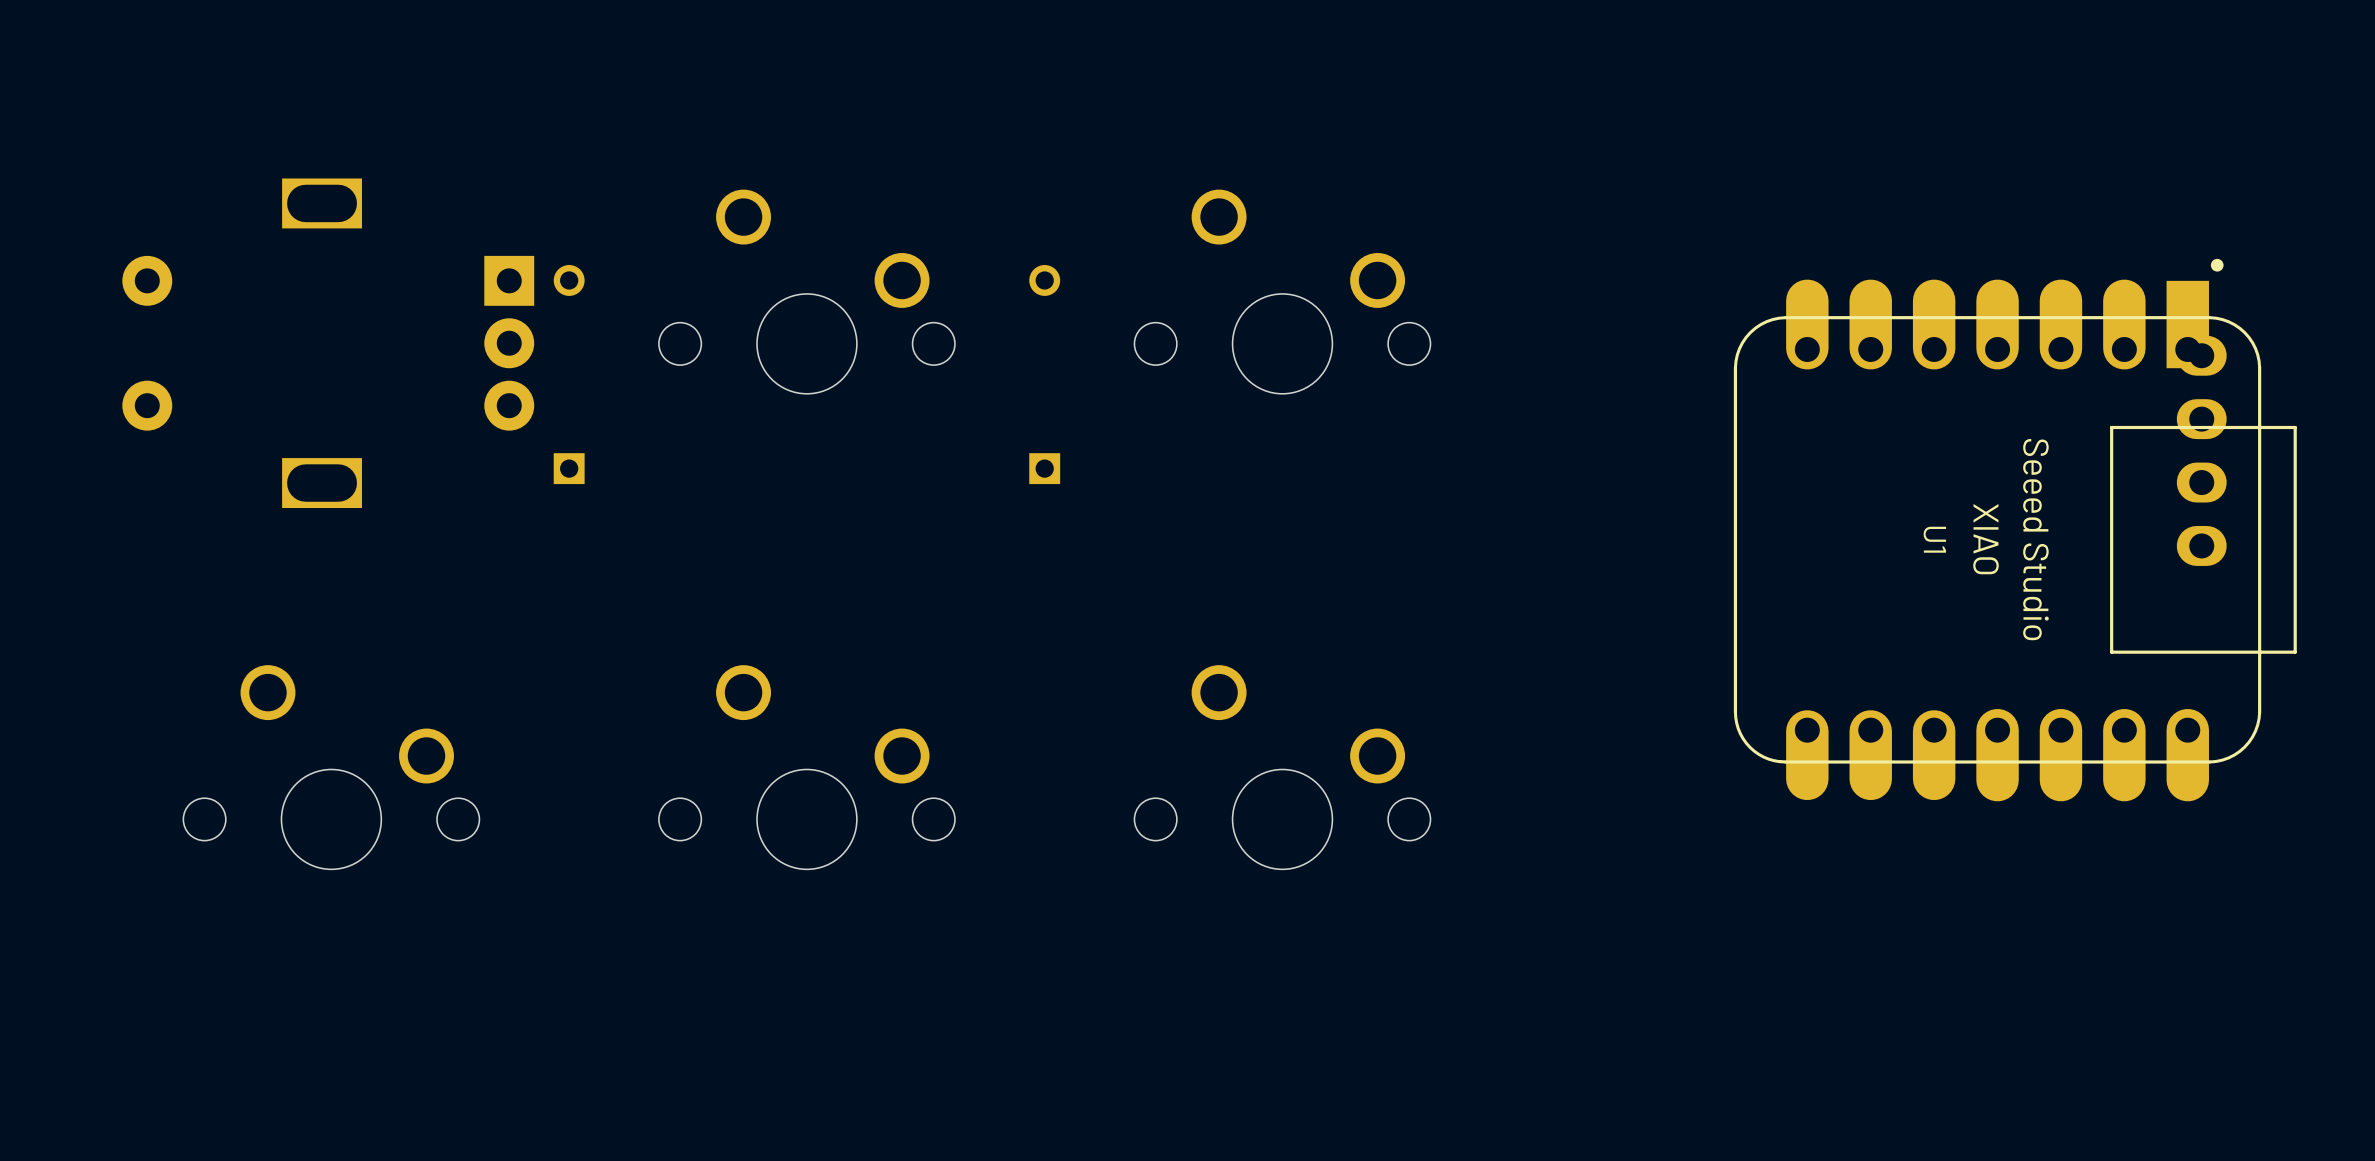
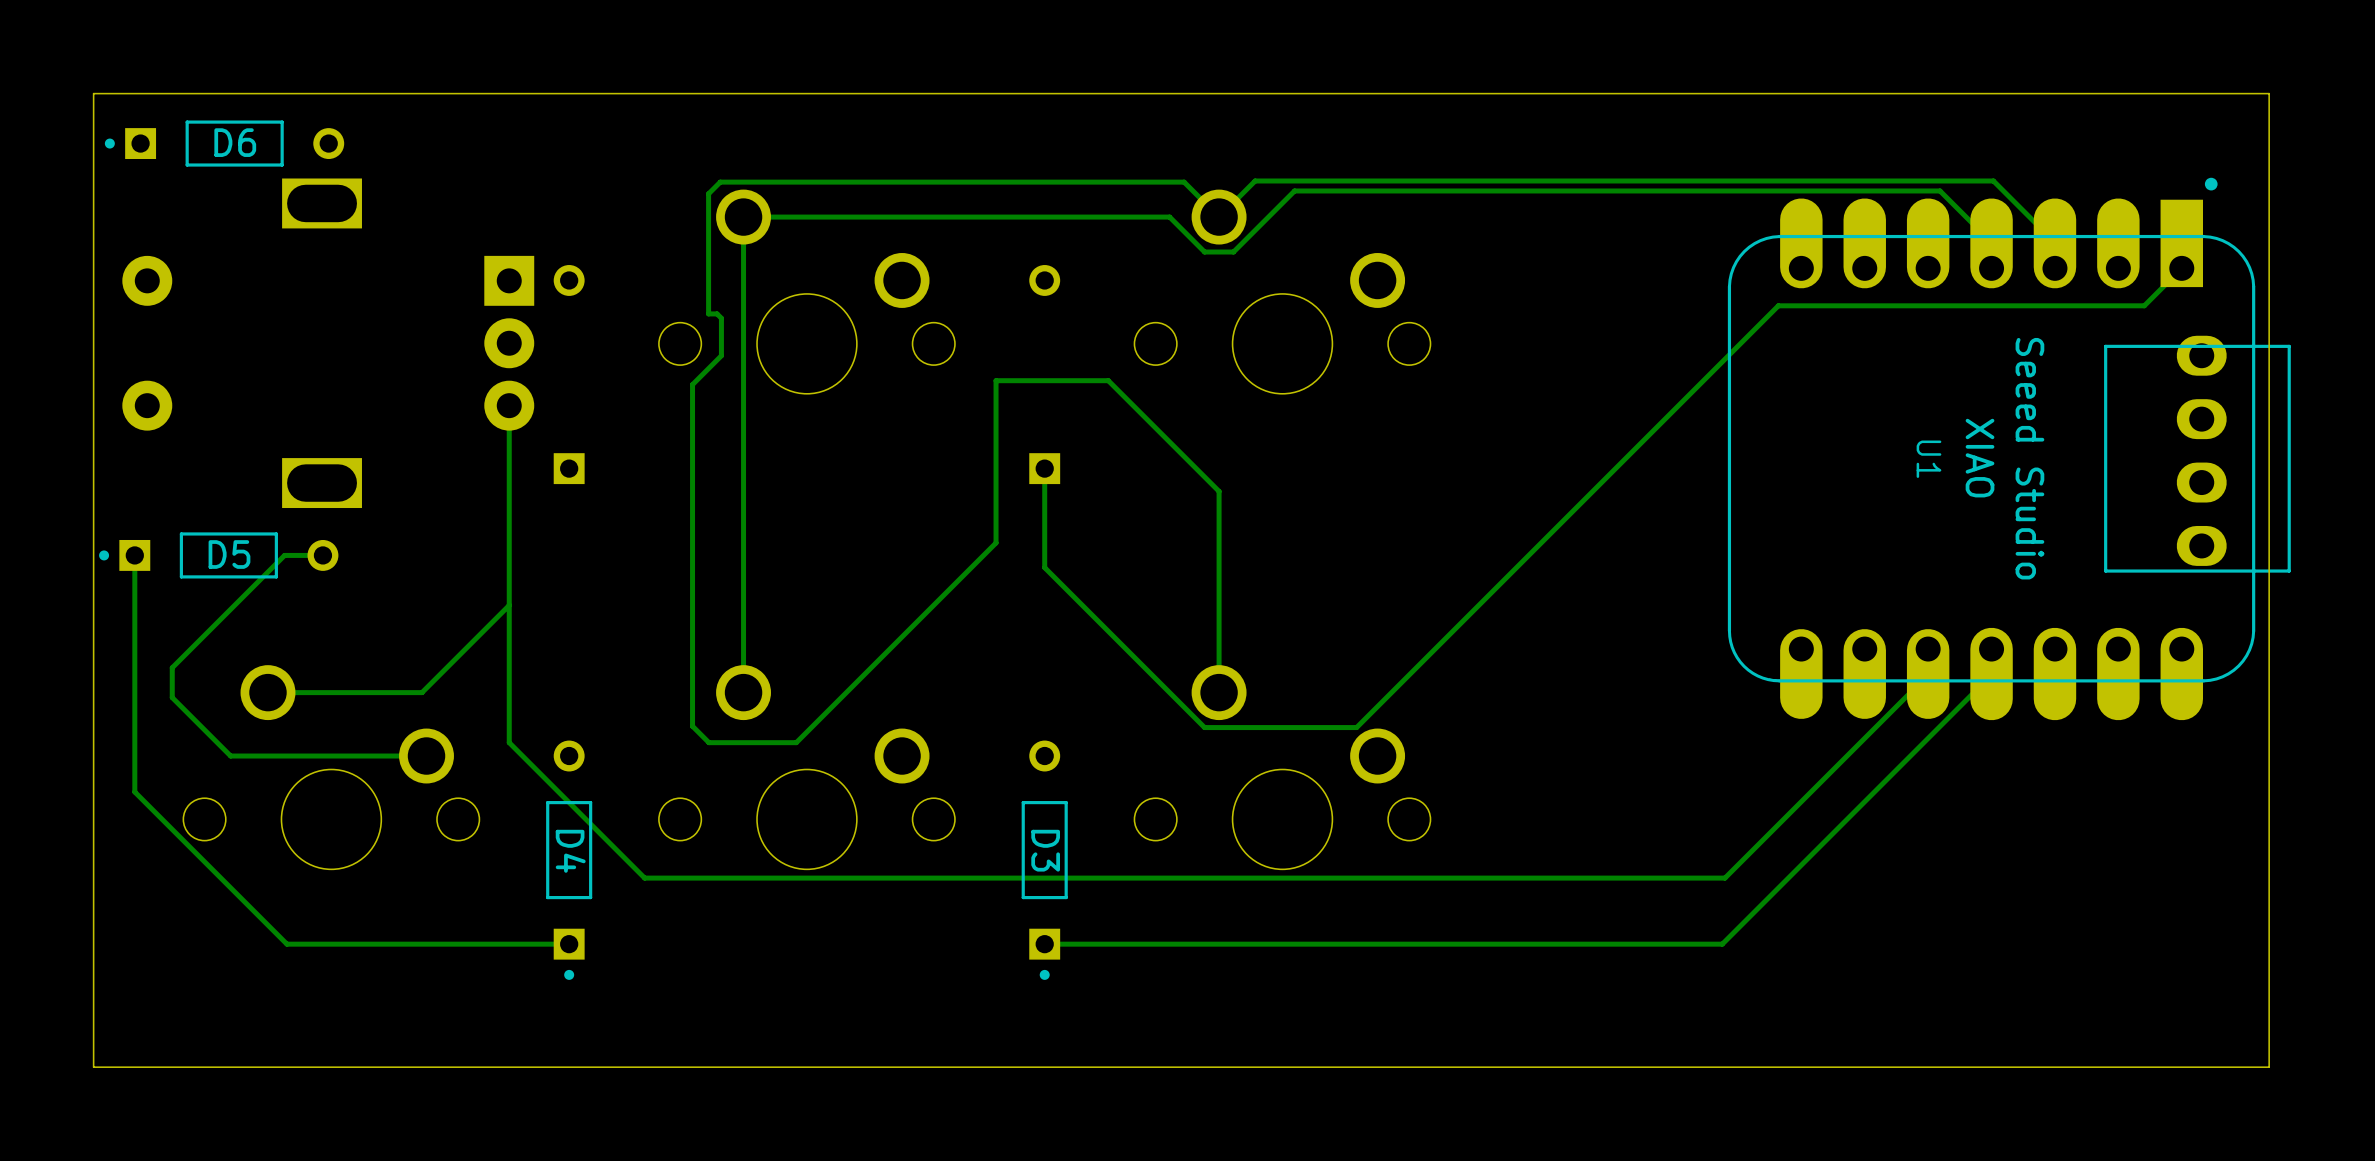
board edge: none -> (2269, 93) (93, 93) (93, 1067) (2269, 1067) (2269, 93)
D6: none -> (224, 143)
track: none -> (1991, 268) (1991, 242) (1940, 190) (1294, 190) (1233, 252) (1204, 252) (1169, 217) (743, 217) (743, 692)
track: none -> (2054, 268) (2054, 242) (1993, 180) (1255, 180) (1219, 217) (1184, 182) (720, 182) (708, 193) (708, 313) (717, 313) (721, 318) (721, 355) (692, 384) (692, 726) (708, 742) (796, 742) (996, 542) (996, 380) (1108, 380) (1219, 491) (1219, 692)
track: none -> (2181, 268) (2144, 305) (1778, 305) (1356, 727) (1204, 727) (1044, 567) (1044, 468)
track: none -> (509, 405) (509, 742) (644, 878) (1724, 878) (1928, 674) (1928, 649)
U1 position: (2015, 530) -> (2009, 448)
track: none -> (134, 555) (134, 792) (286, 944) (569, 944)
D5: none -> (218, 555)
track: none -> (322, 555) (284, 555) (172, 667) (172, 697) (230, 756) (426, 756)
track: none -> (509, 605) (422, 692) (267, 692)
track: none -> (1991, 649) (1991, 674) (1722, 944) (1044, 944)
D4: none -> (569, 860)
D3: none -> (1044, 860)

